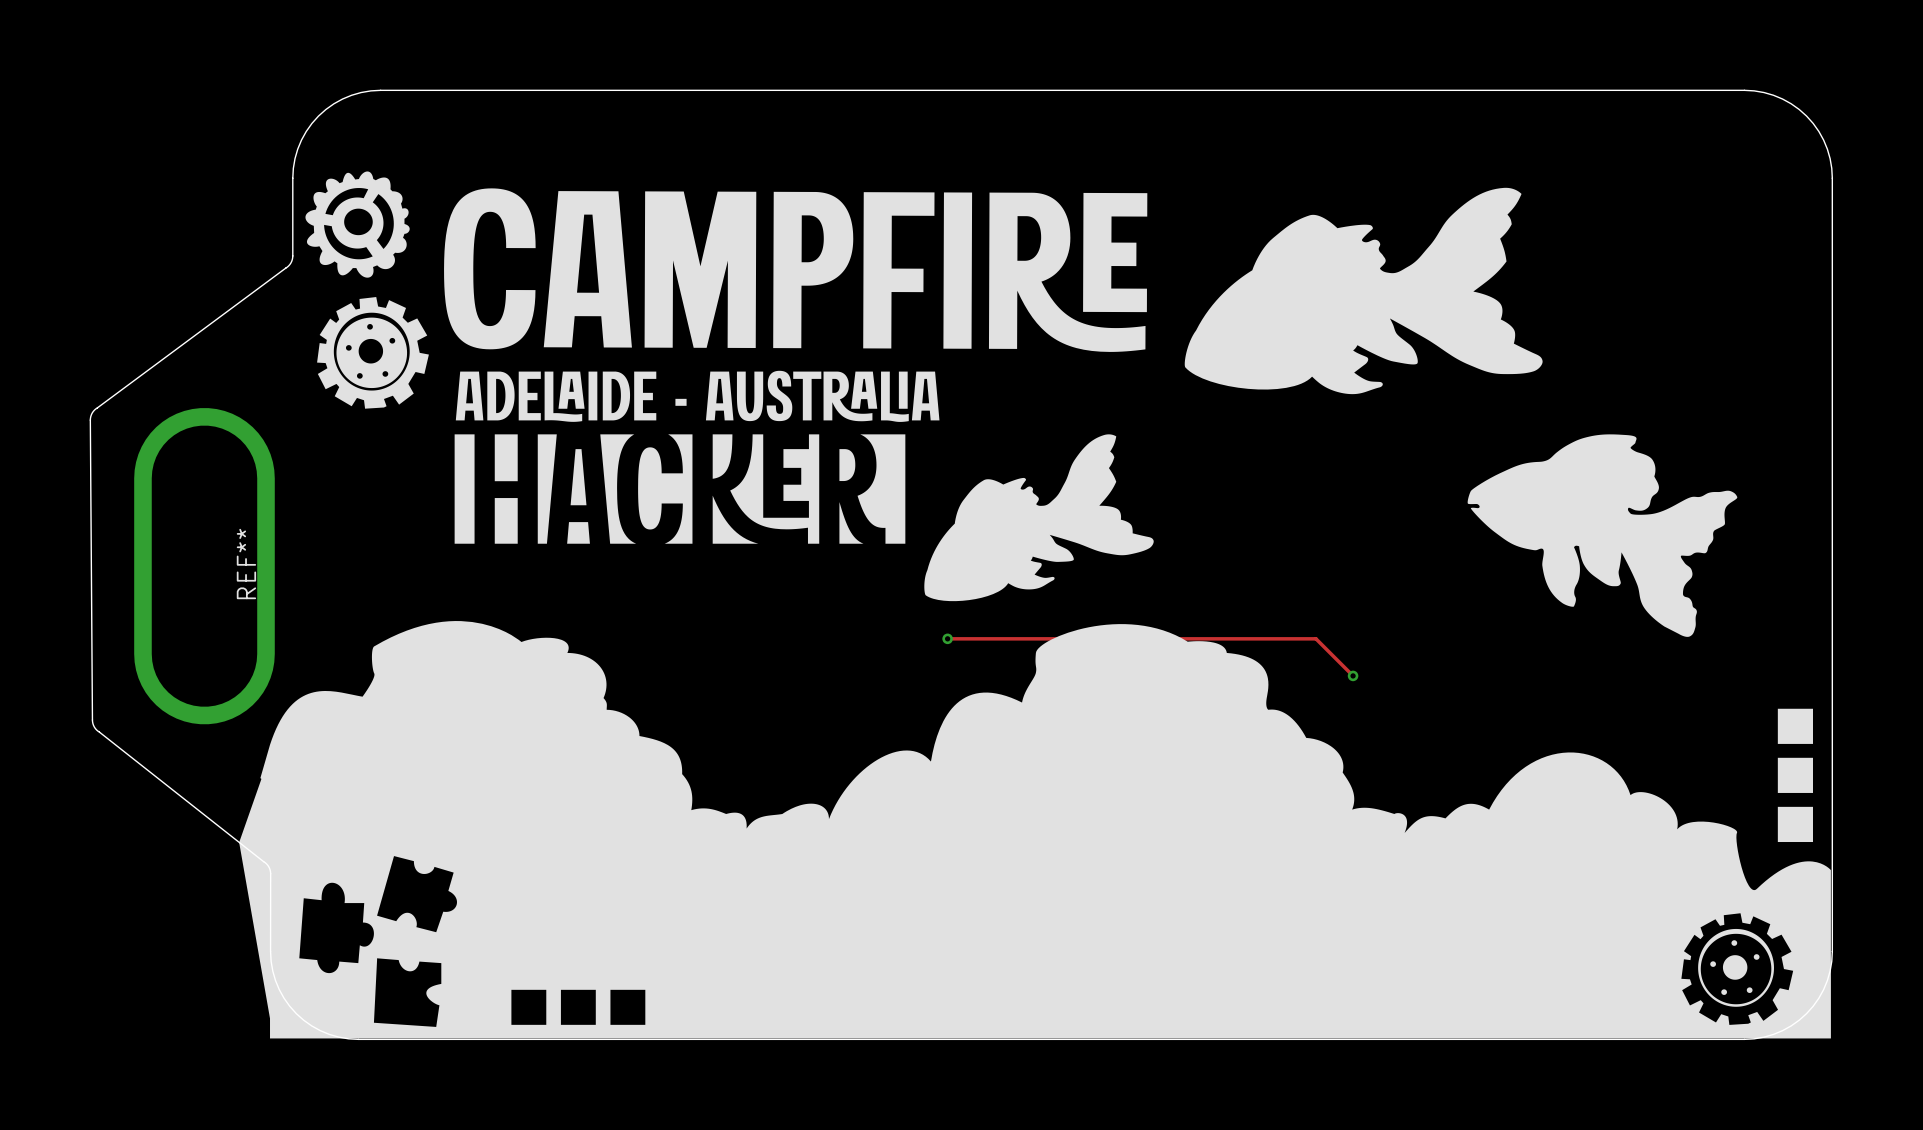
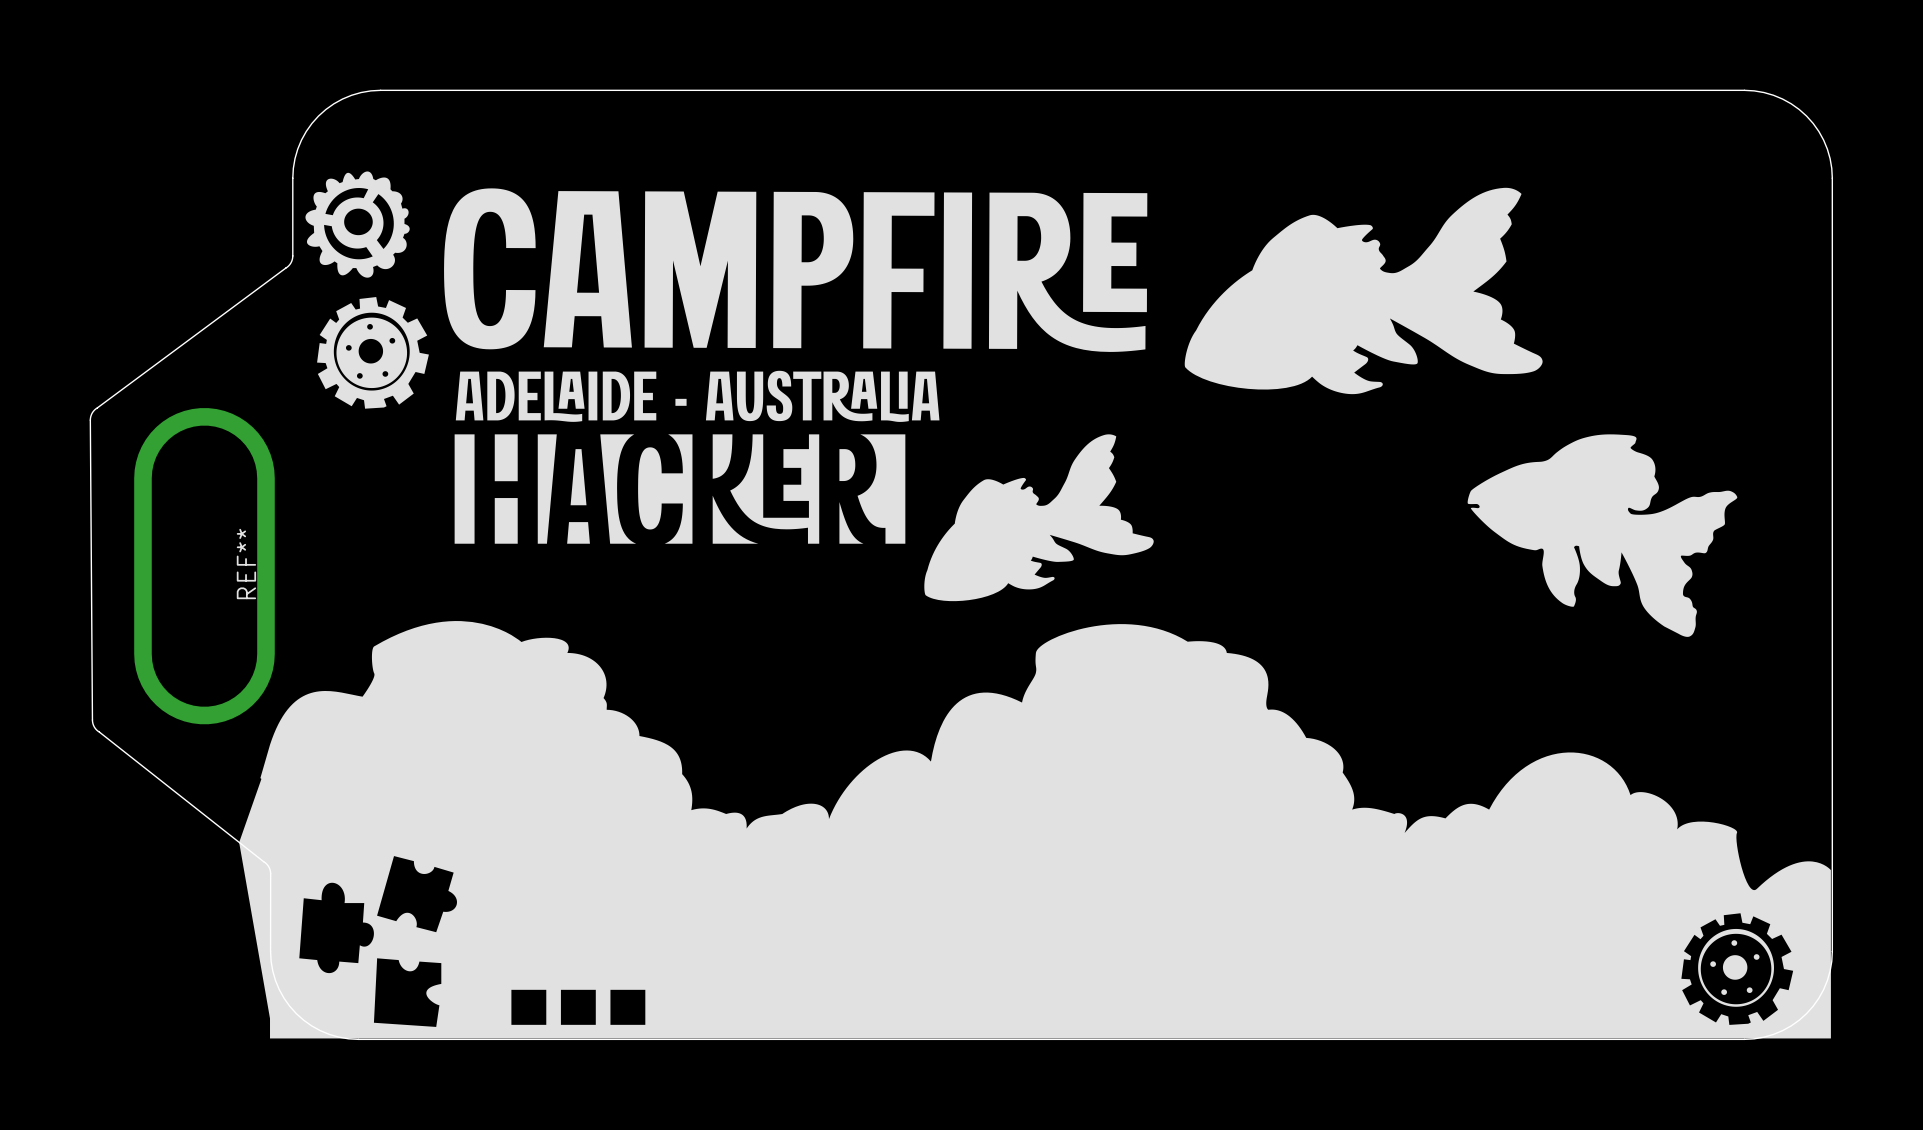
track: (947, 638) (1315, 638) (1353, 675) -> none
via: (947, 638) -> none
via: (1353, 675) -> none
drawing: [1777, 708, 1813, 843] -> none

